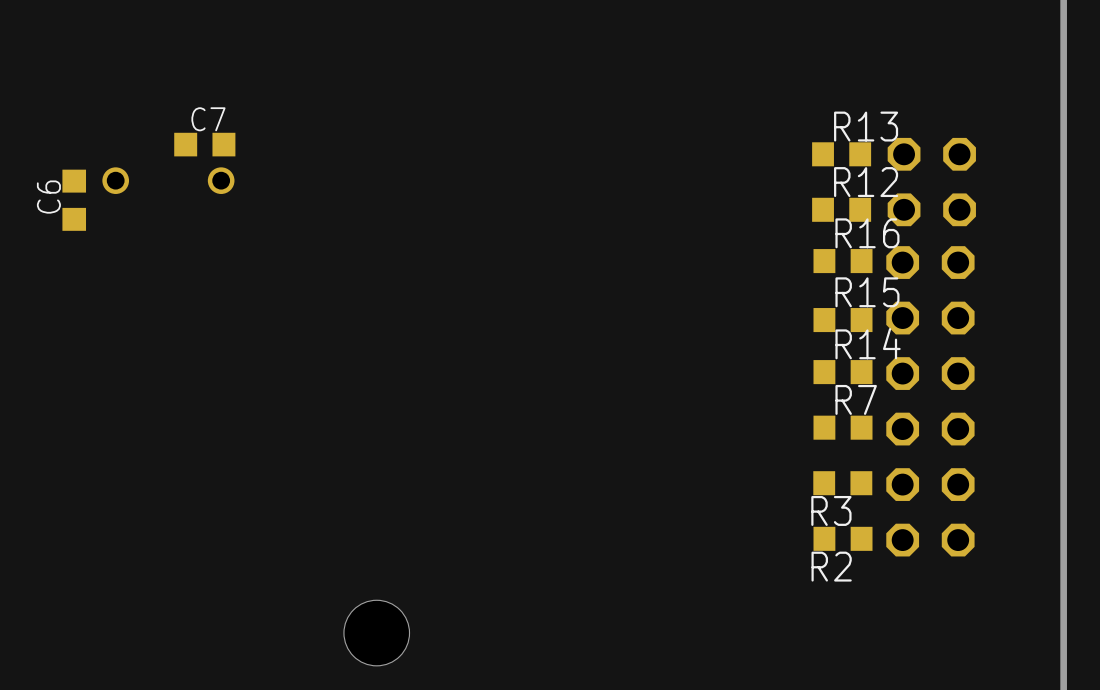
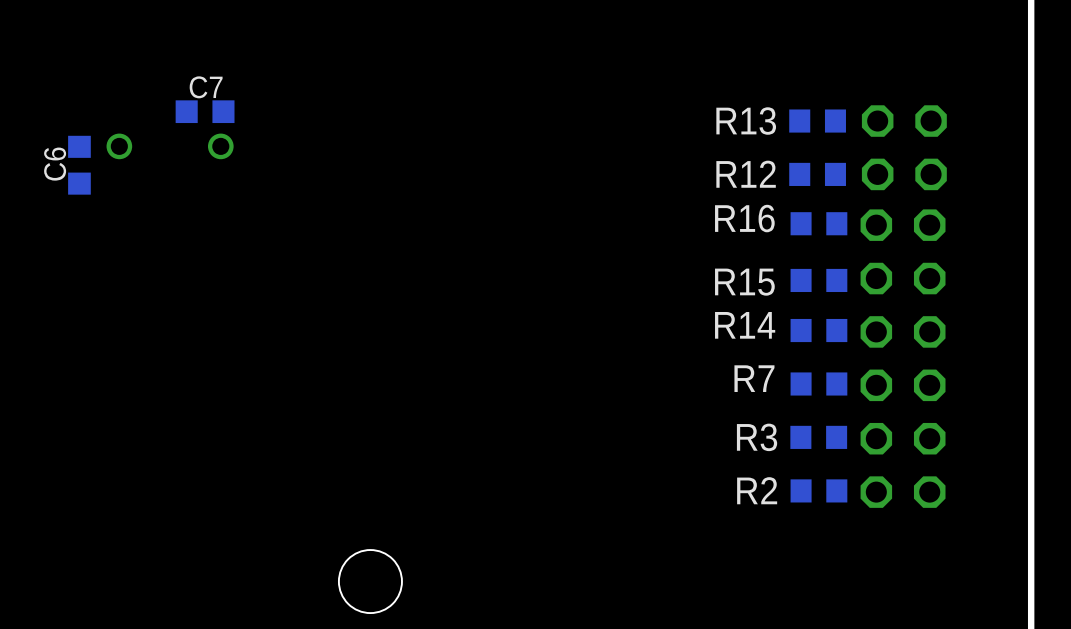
R13 name position: R13 (866, 126) -> R13 (746, 121)
R12 name position: R12 (866, 182) -> R12 (746, 174)
R16 name position: R16 (867, 233) -> R16 (744, 218)
R15 name position: R15 (867, 292) -> R15 (744, 282)
R14 name position: R14 (868, 343) -> R14 (745, 325)
R7 name position: R7 (856, 399) -> R7 (754, 378)
R3 name position: R3 (831, 510) -> R3 (757, 437)
R2 name position: R2 (831, 566) -> R2 (757, 490)

